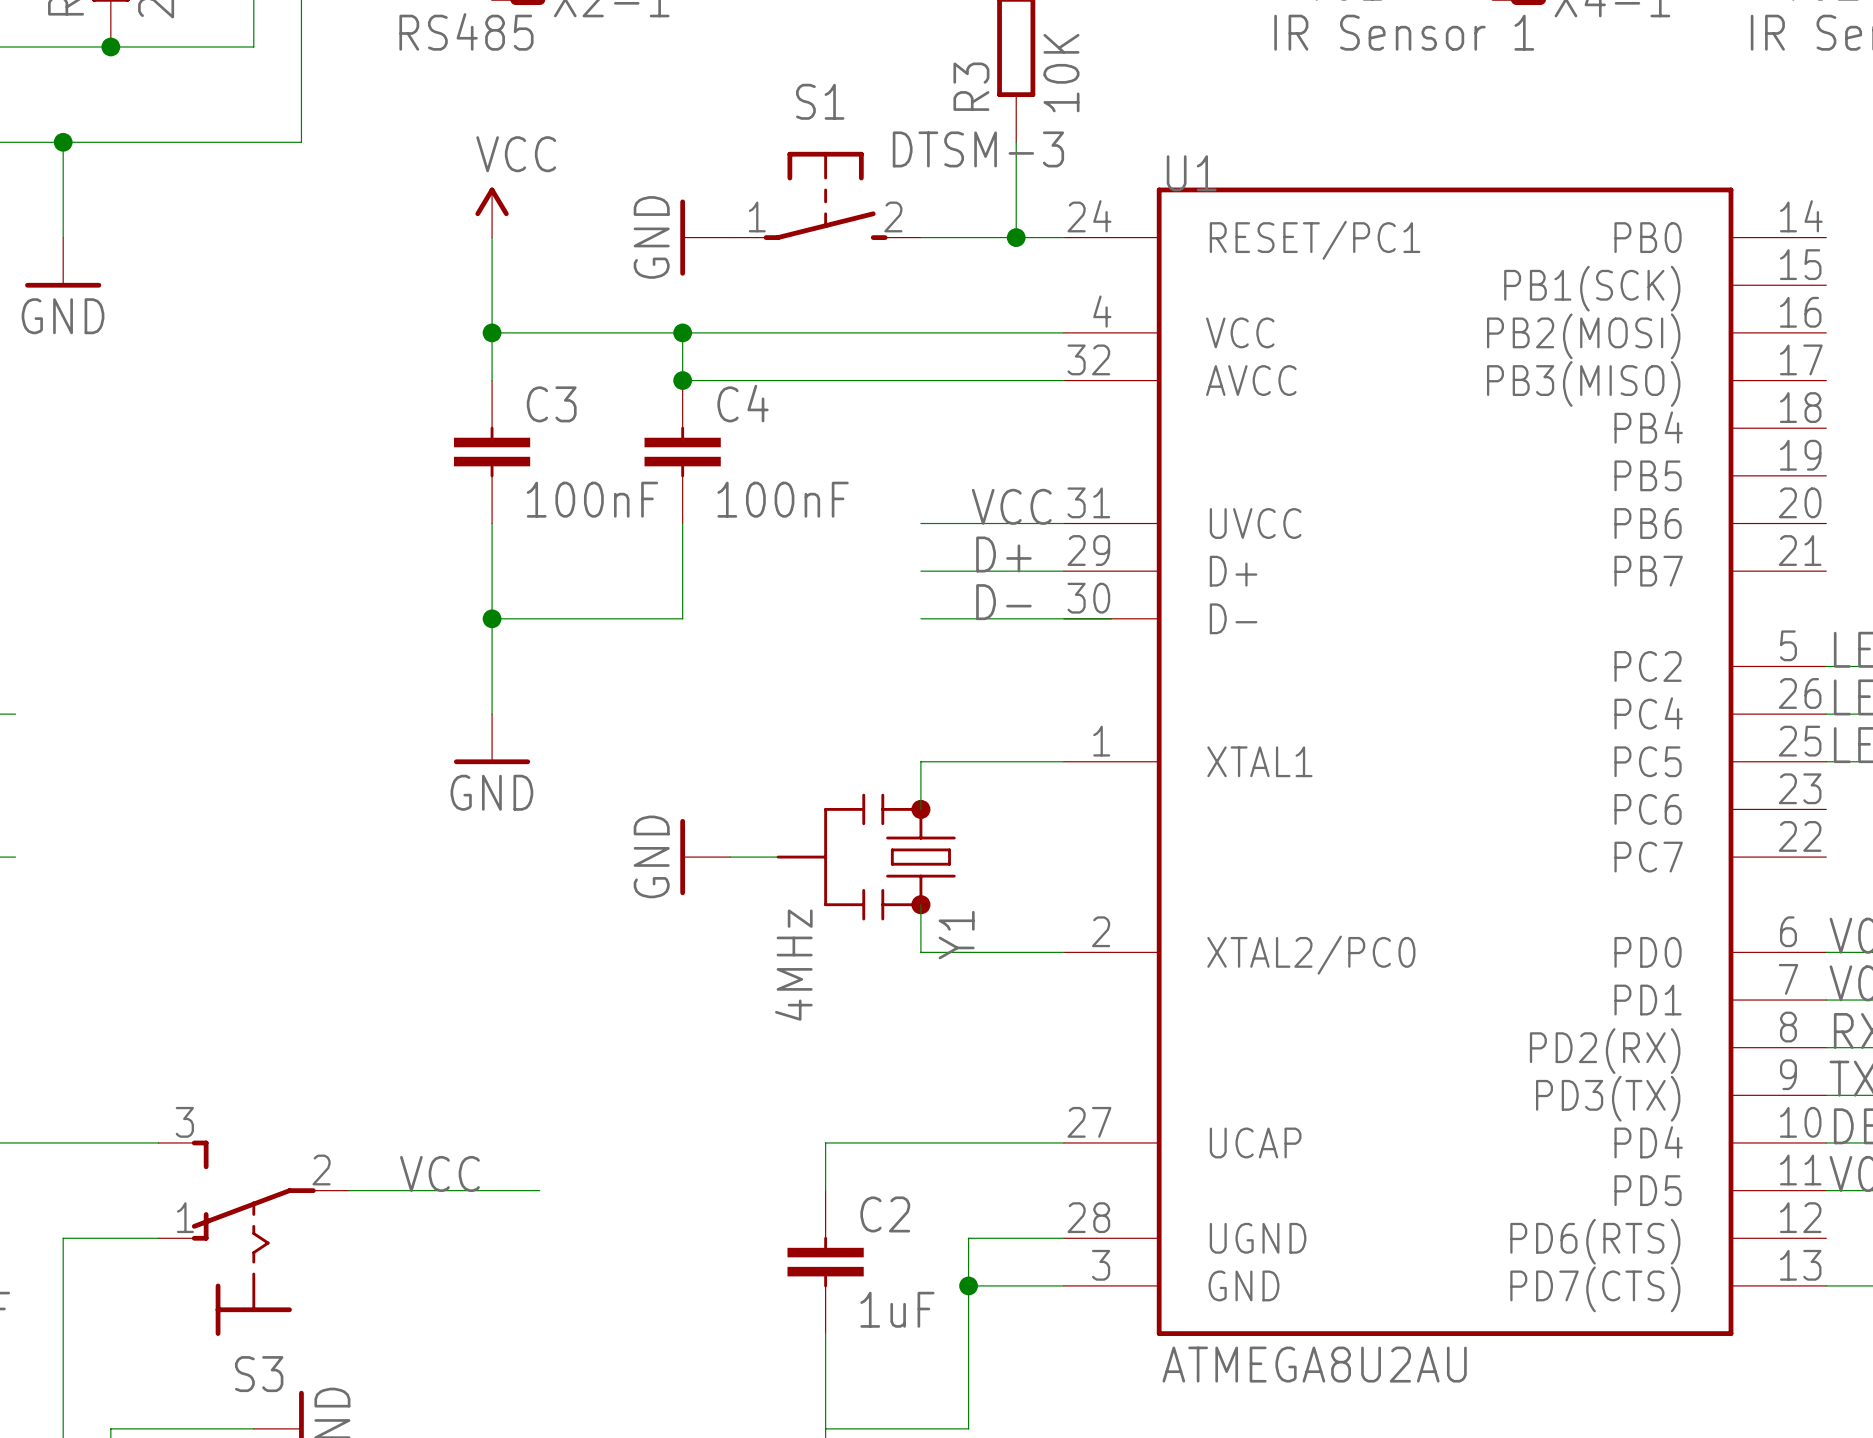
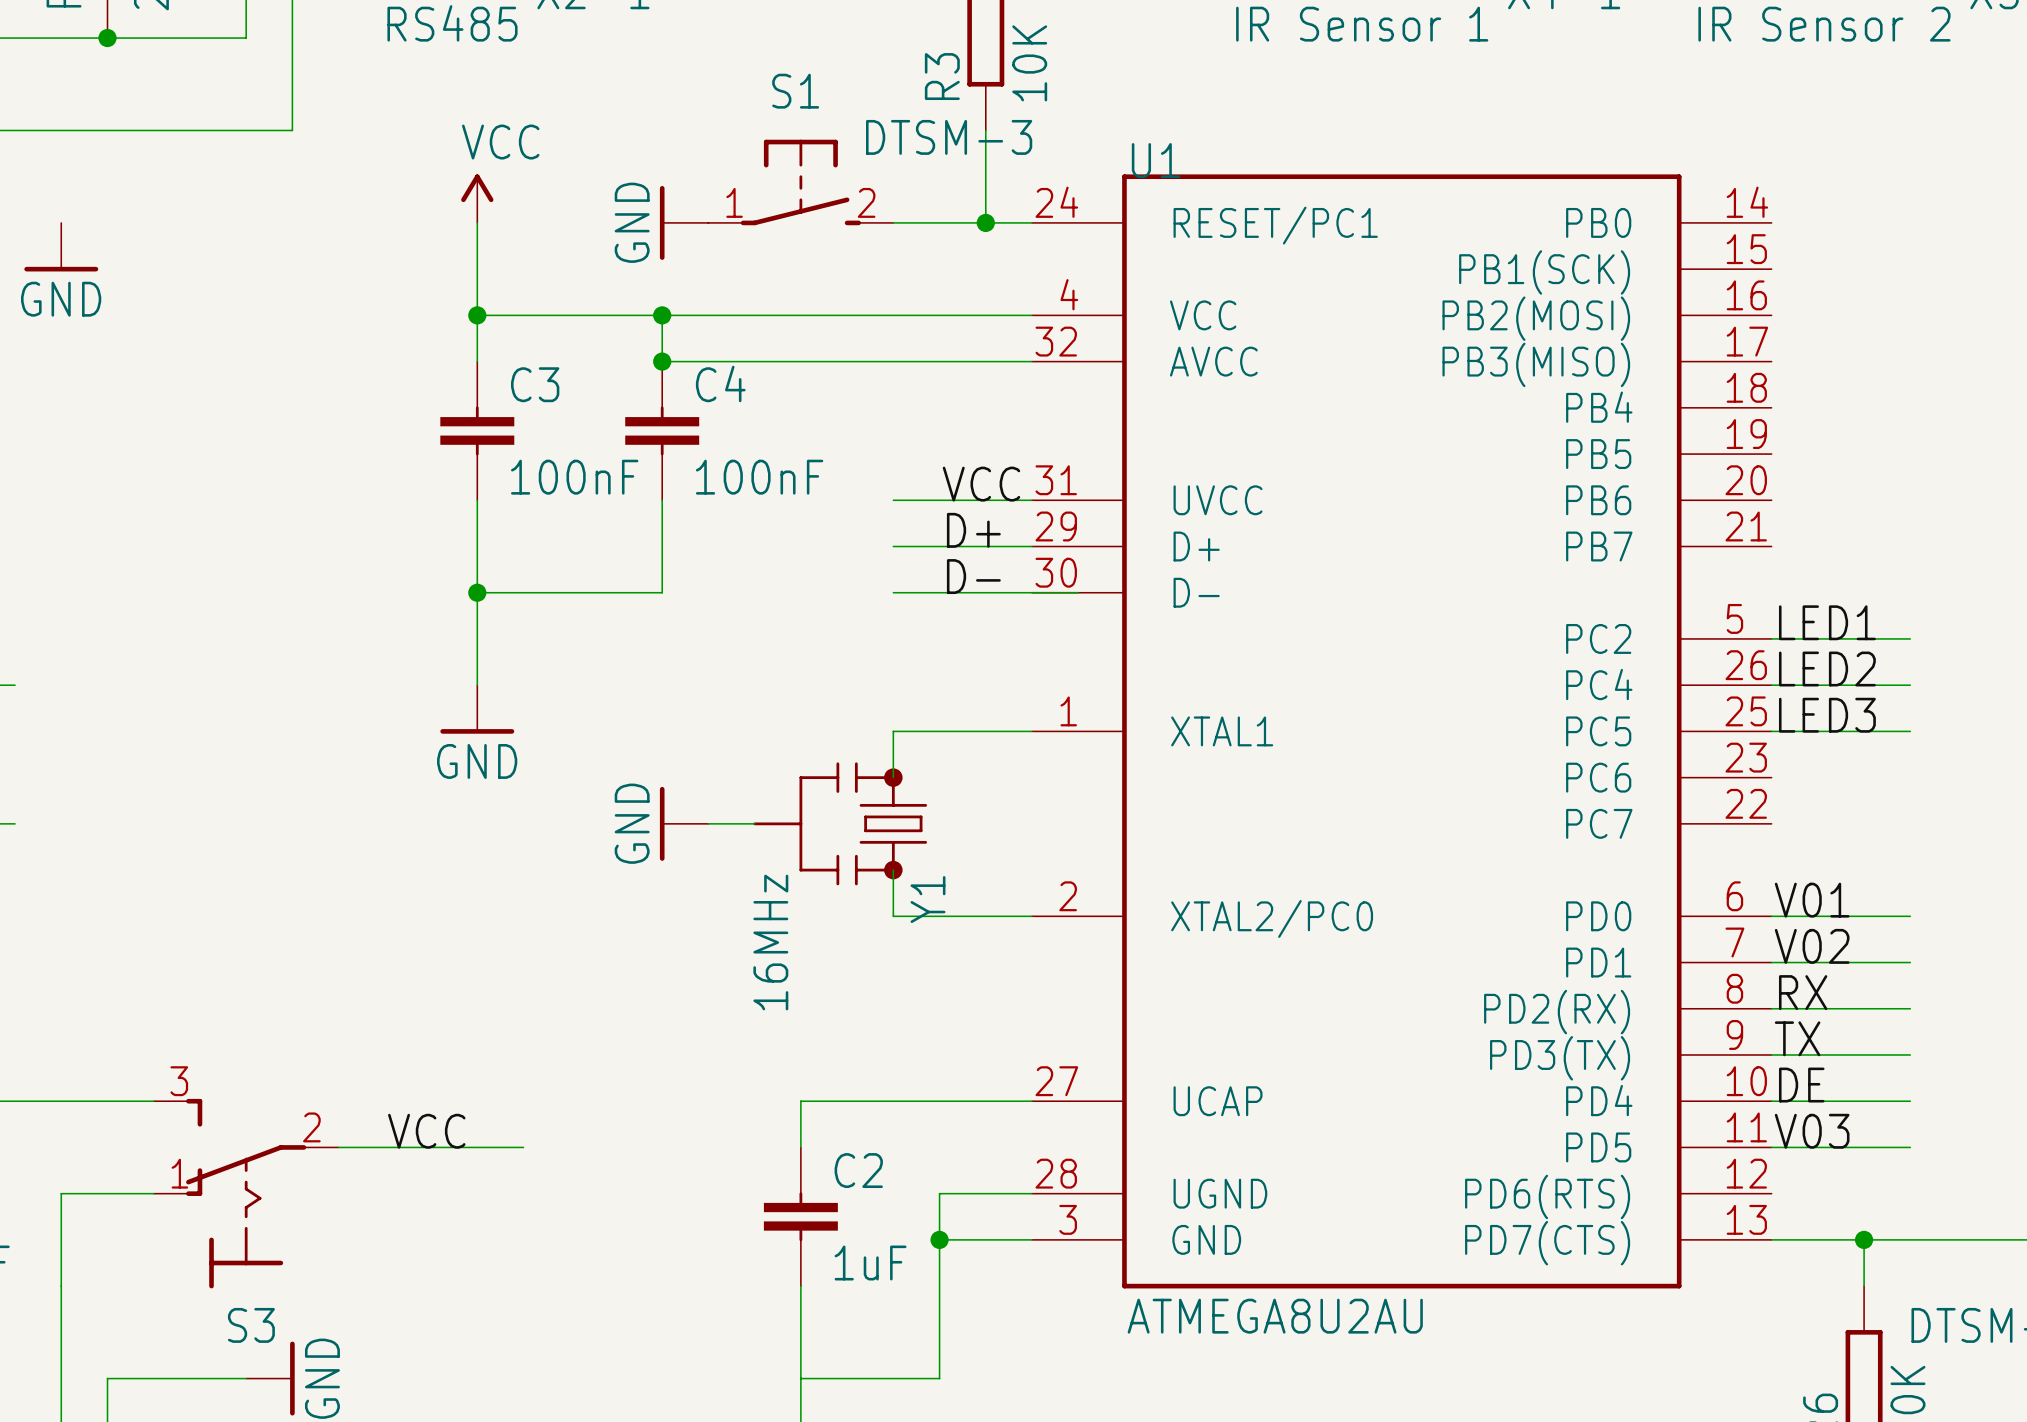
wire: (63, 142) (63, 237) -> none
junction: (63, 142) -> none
Y1 value: 4MHz (793, 965) -> 16MHz (770, 942)

